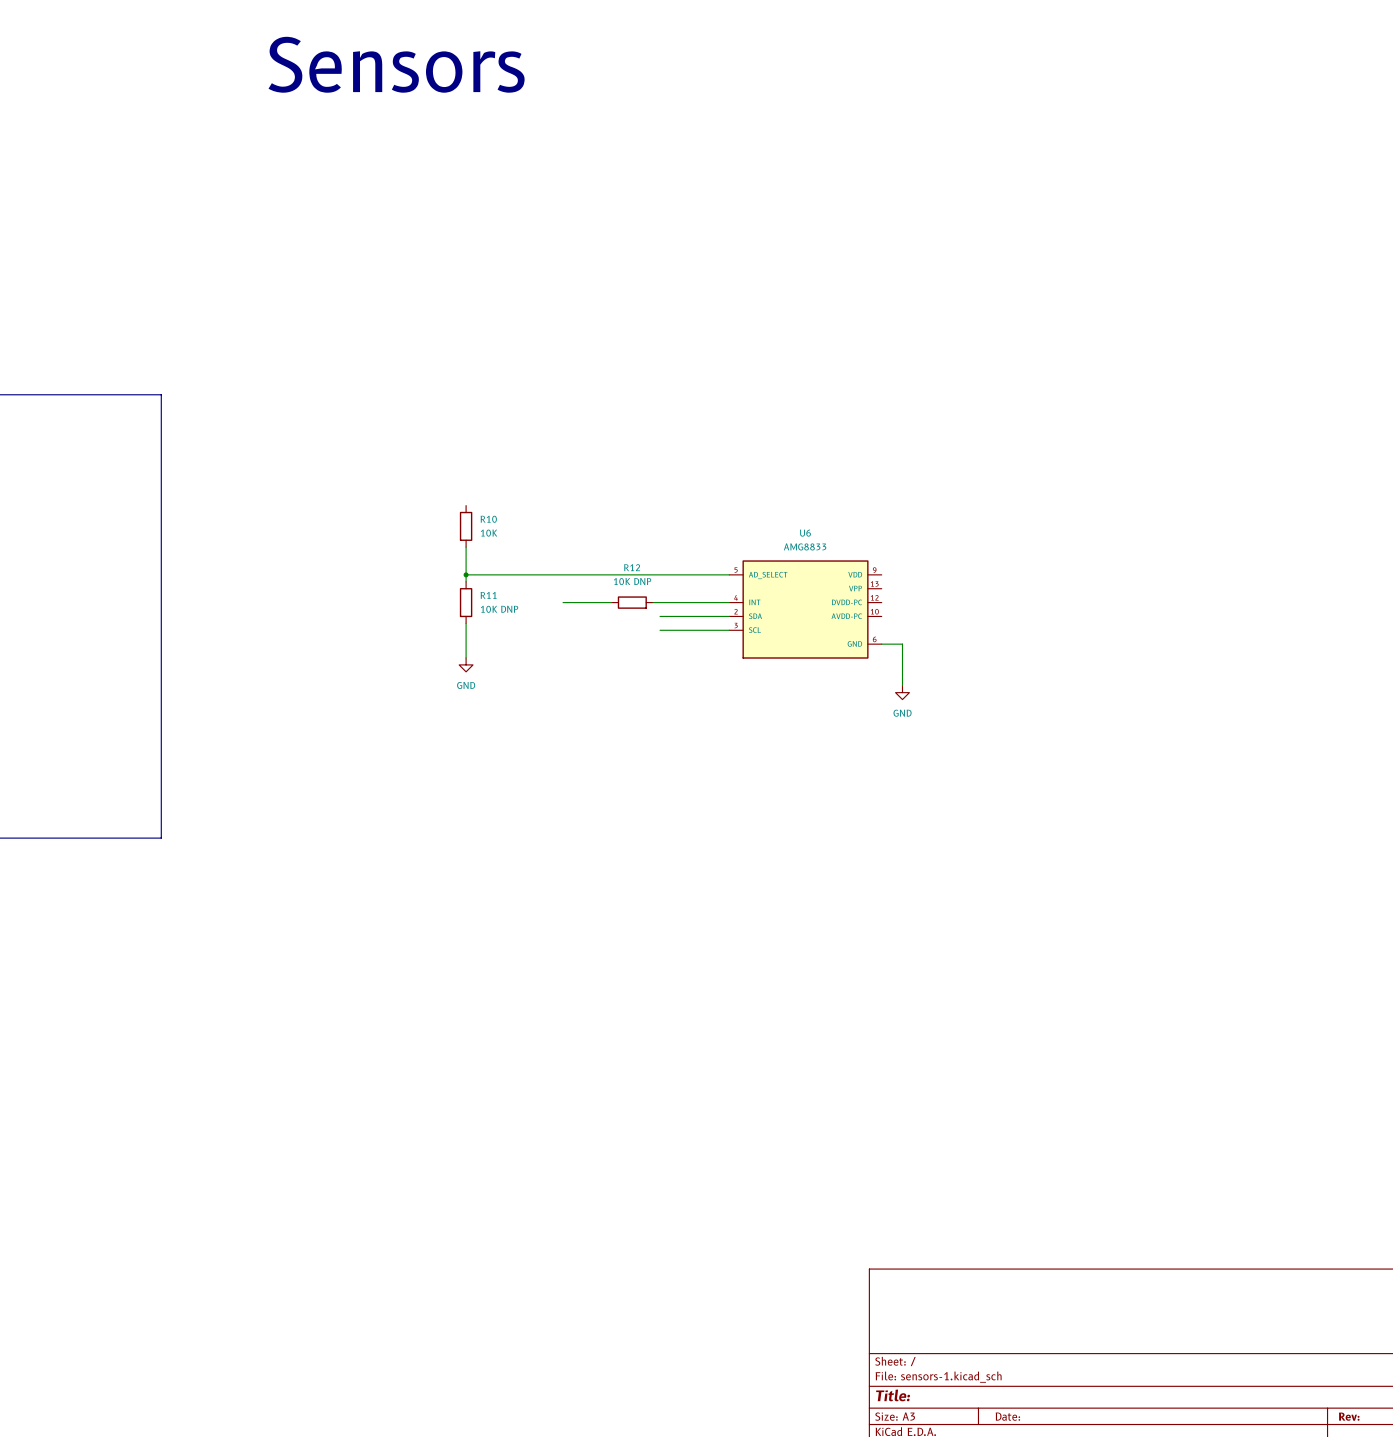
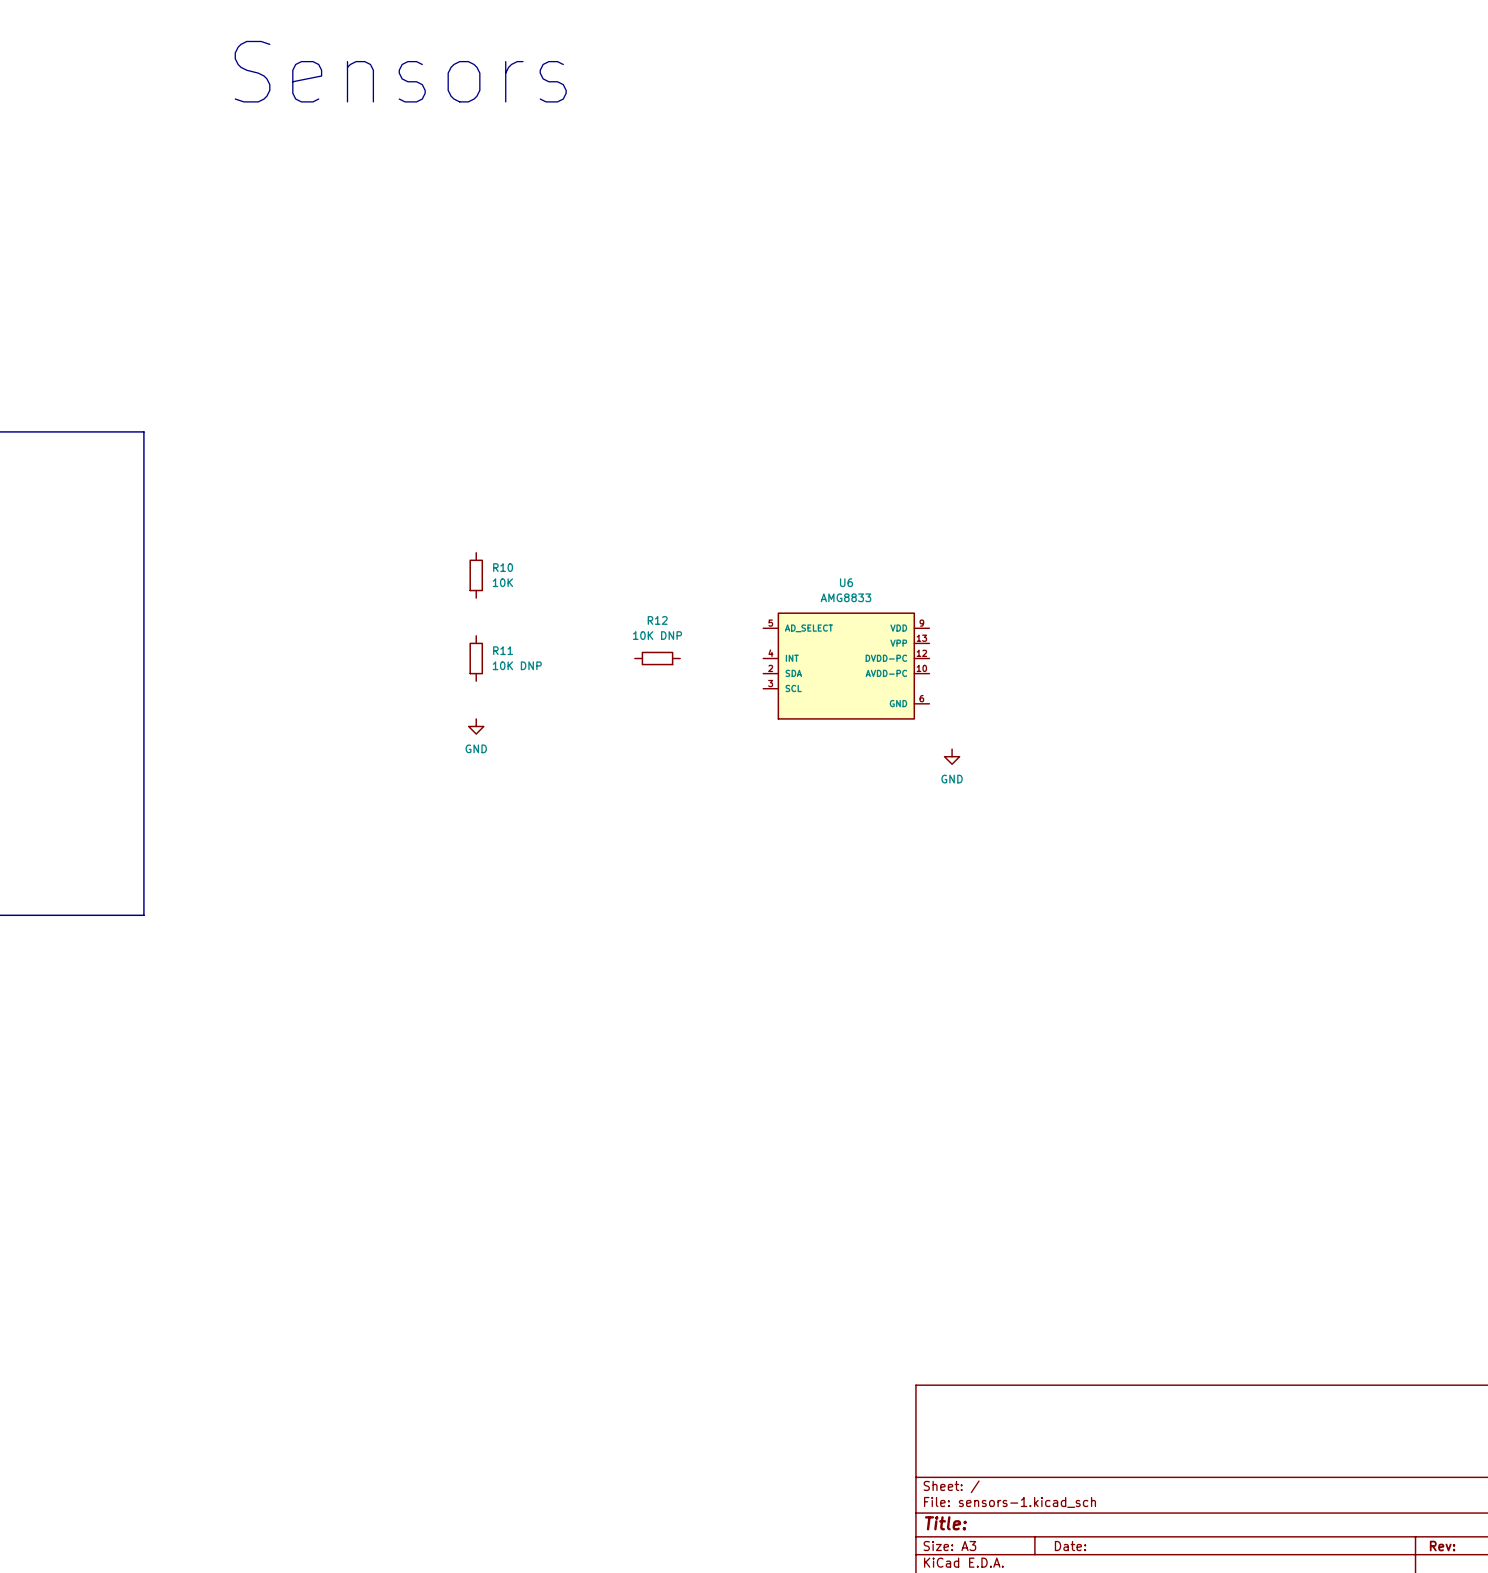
wire: (466, 547) (466, 581) -> none
wire: (466, 574) (729, 574) -> none
junction: (466, 574) -> none
wire: (563, 602) (611, 602) -> none
wire: (653, 602) (729, 602) -> none
wire: (660, 616) (729, 616) -> none
wire: (466, 623) (466, 658) -> none
wire: (660, 630) (729, 630) -> none
wire: (881, 644) (902, 644) (902, 685) -> none

